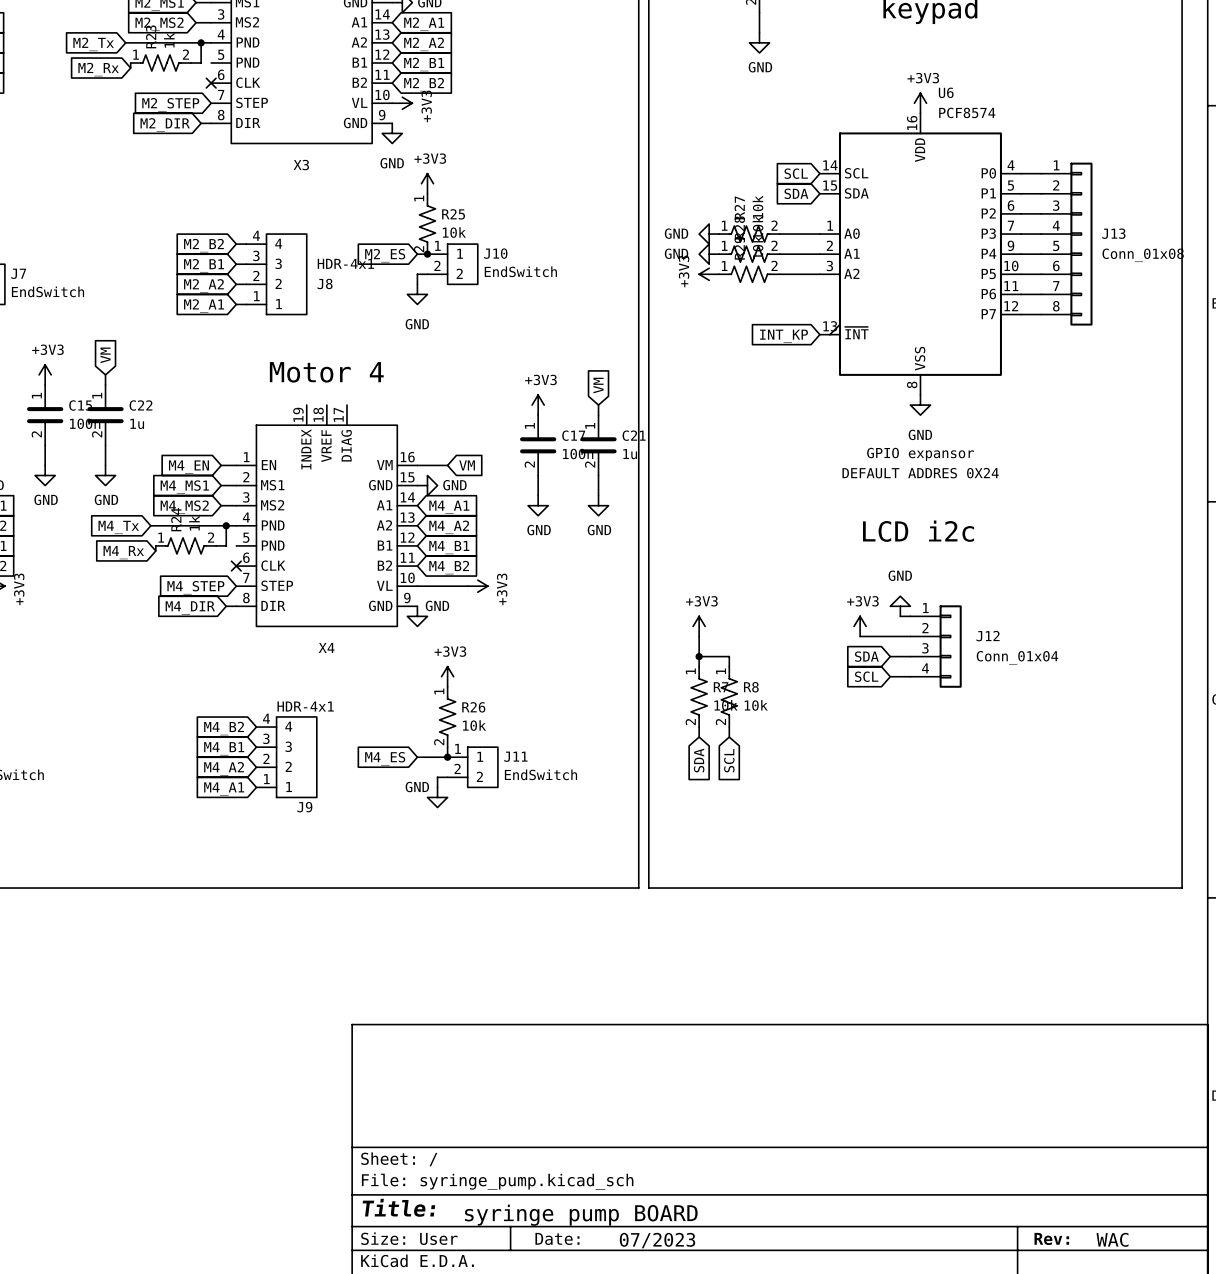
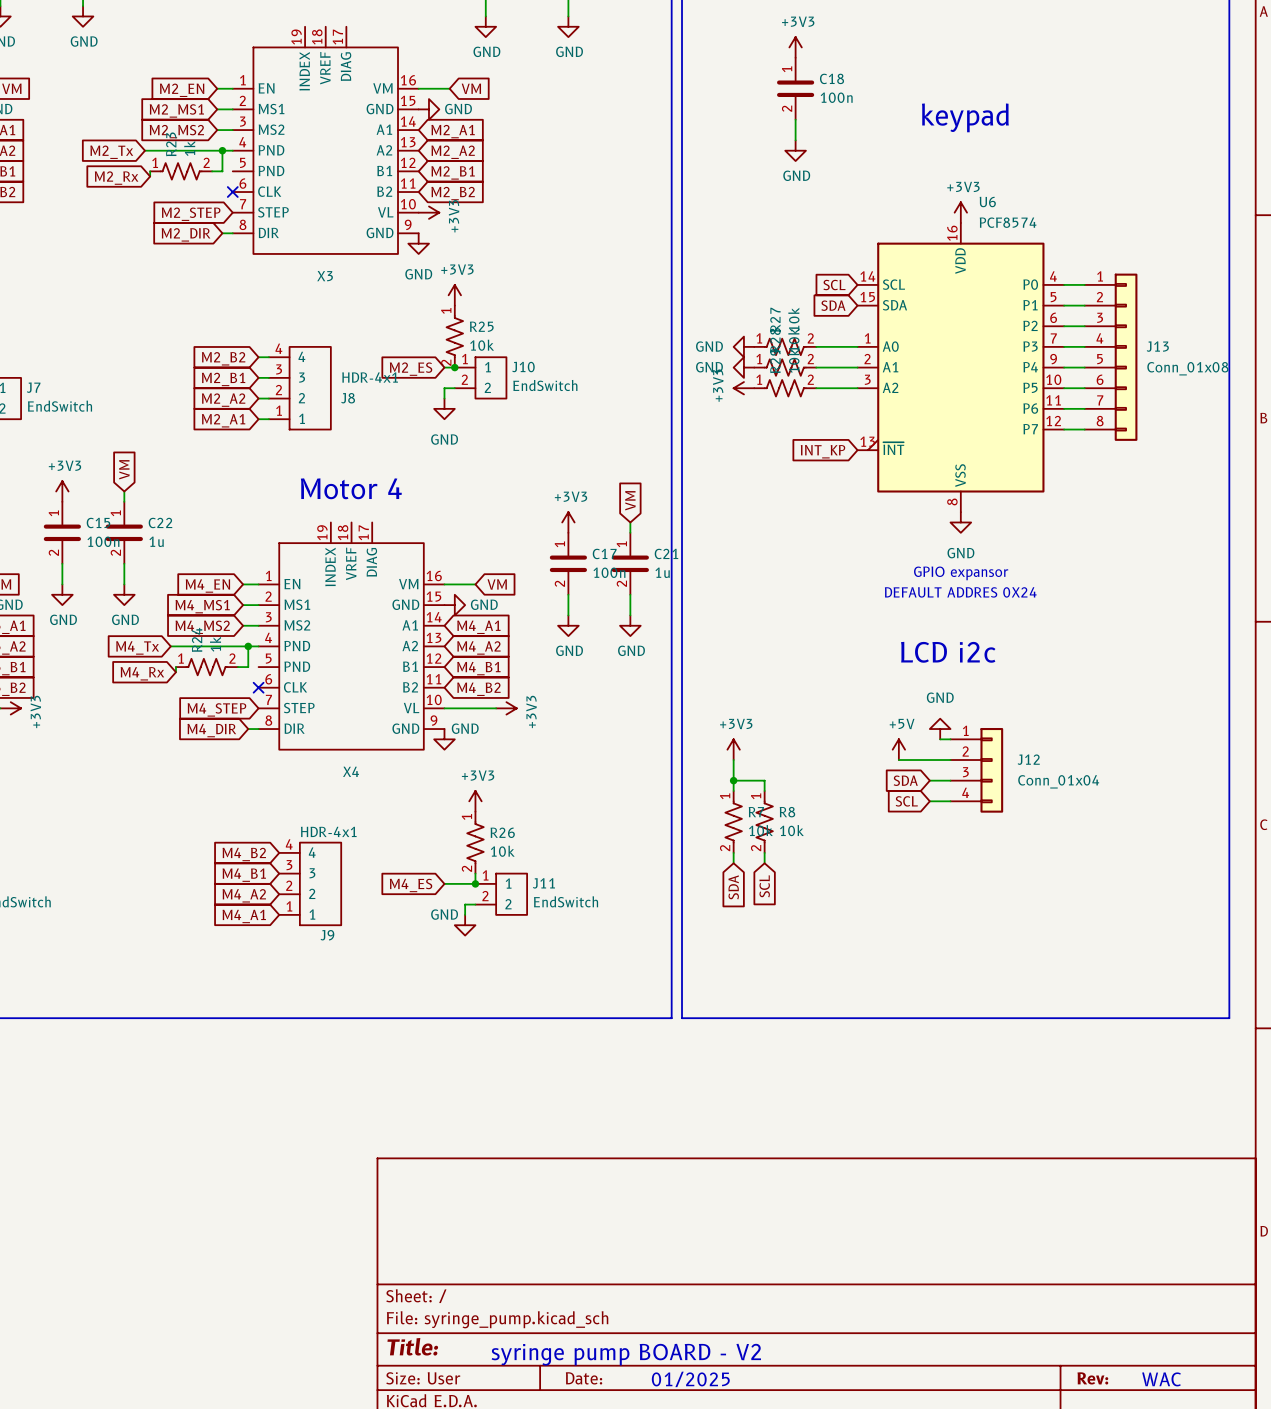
power symbol: +3V3 (860, 626) -> +5V (898, 749)
text: syringe pump BOARD (581, 1215) -> syringe pump BOARD - V2 (626, 1354)
text: 07/2023 (657, 1240) -> 01/2025 (690, 1379)

